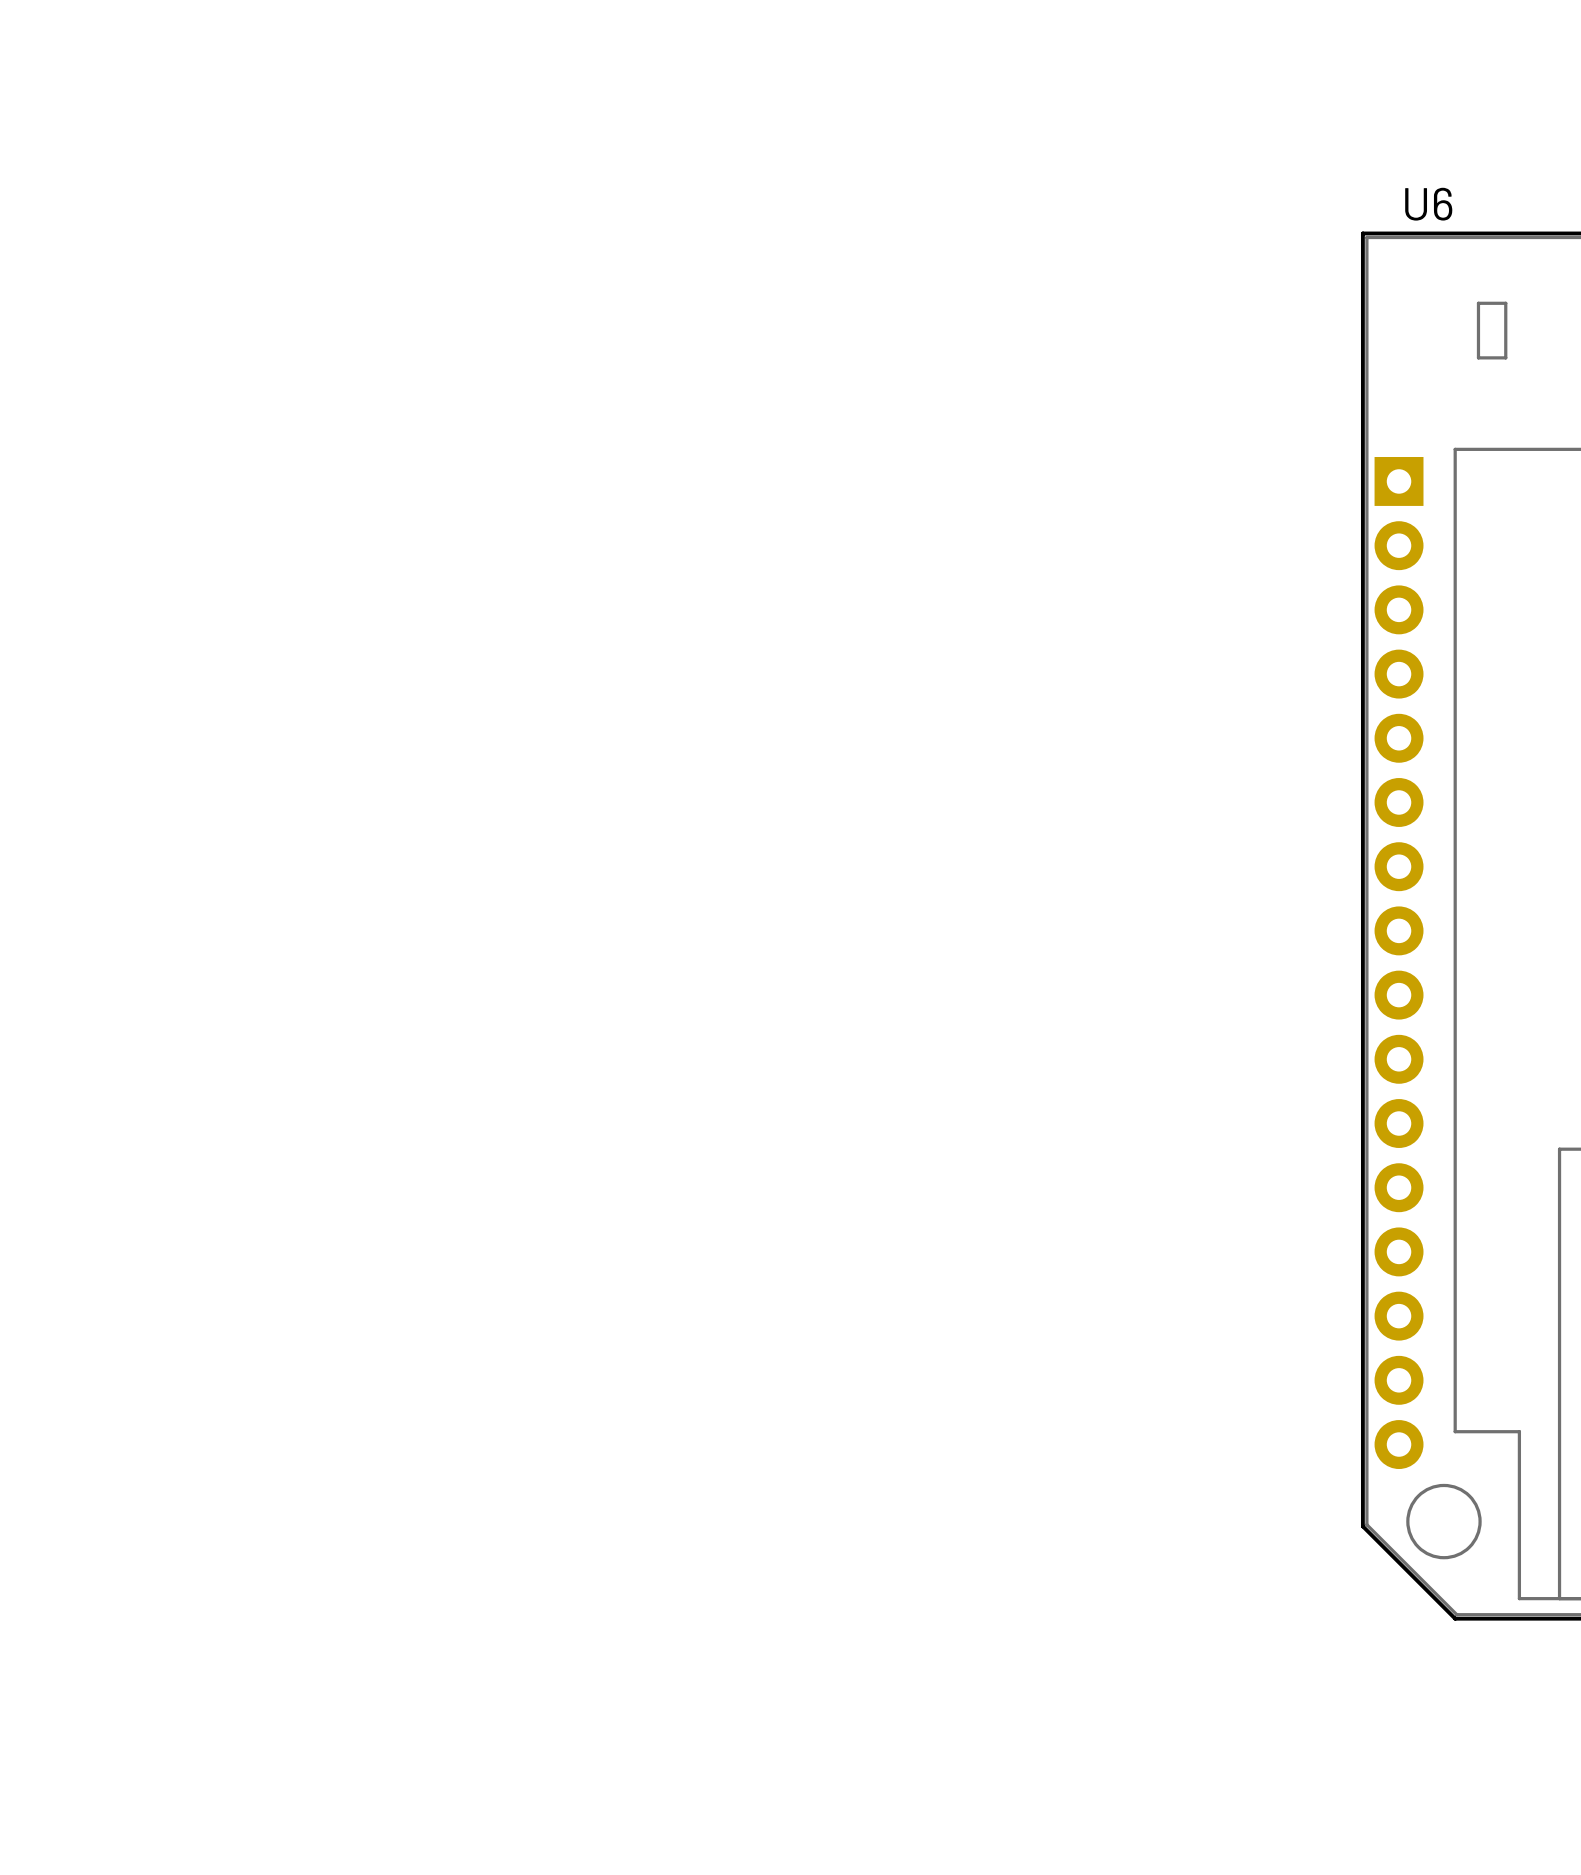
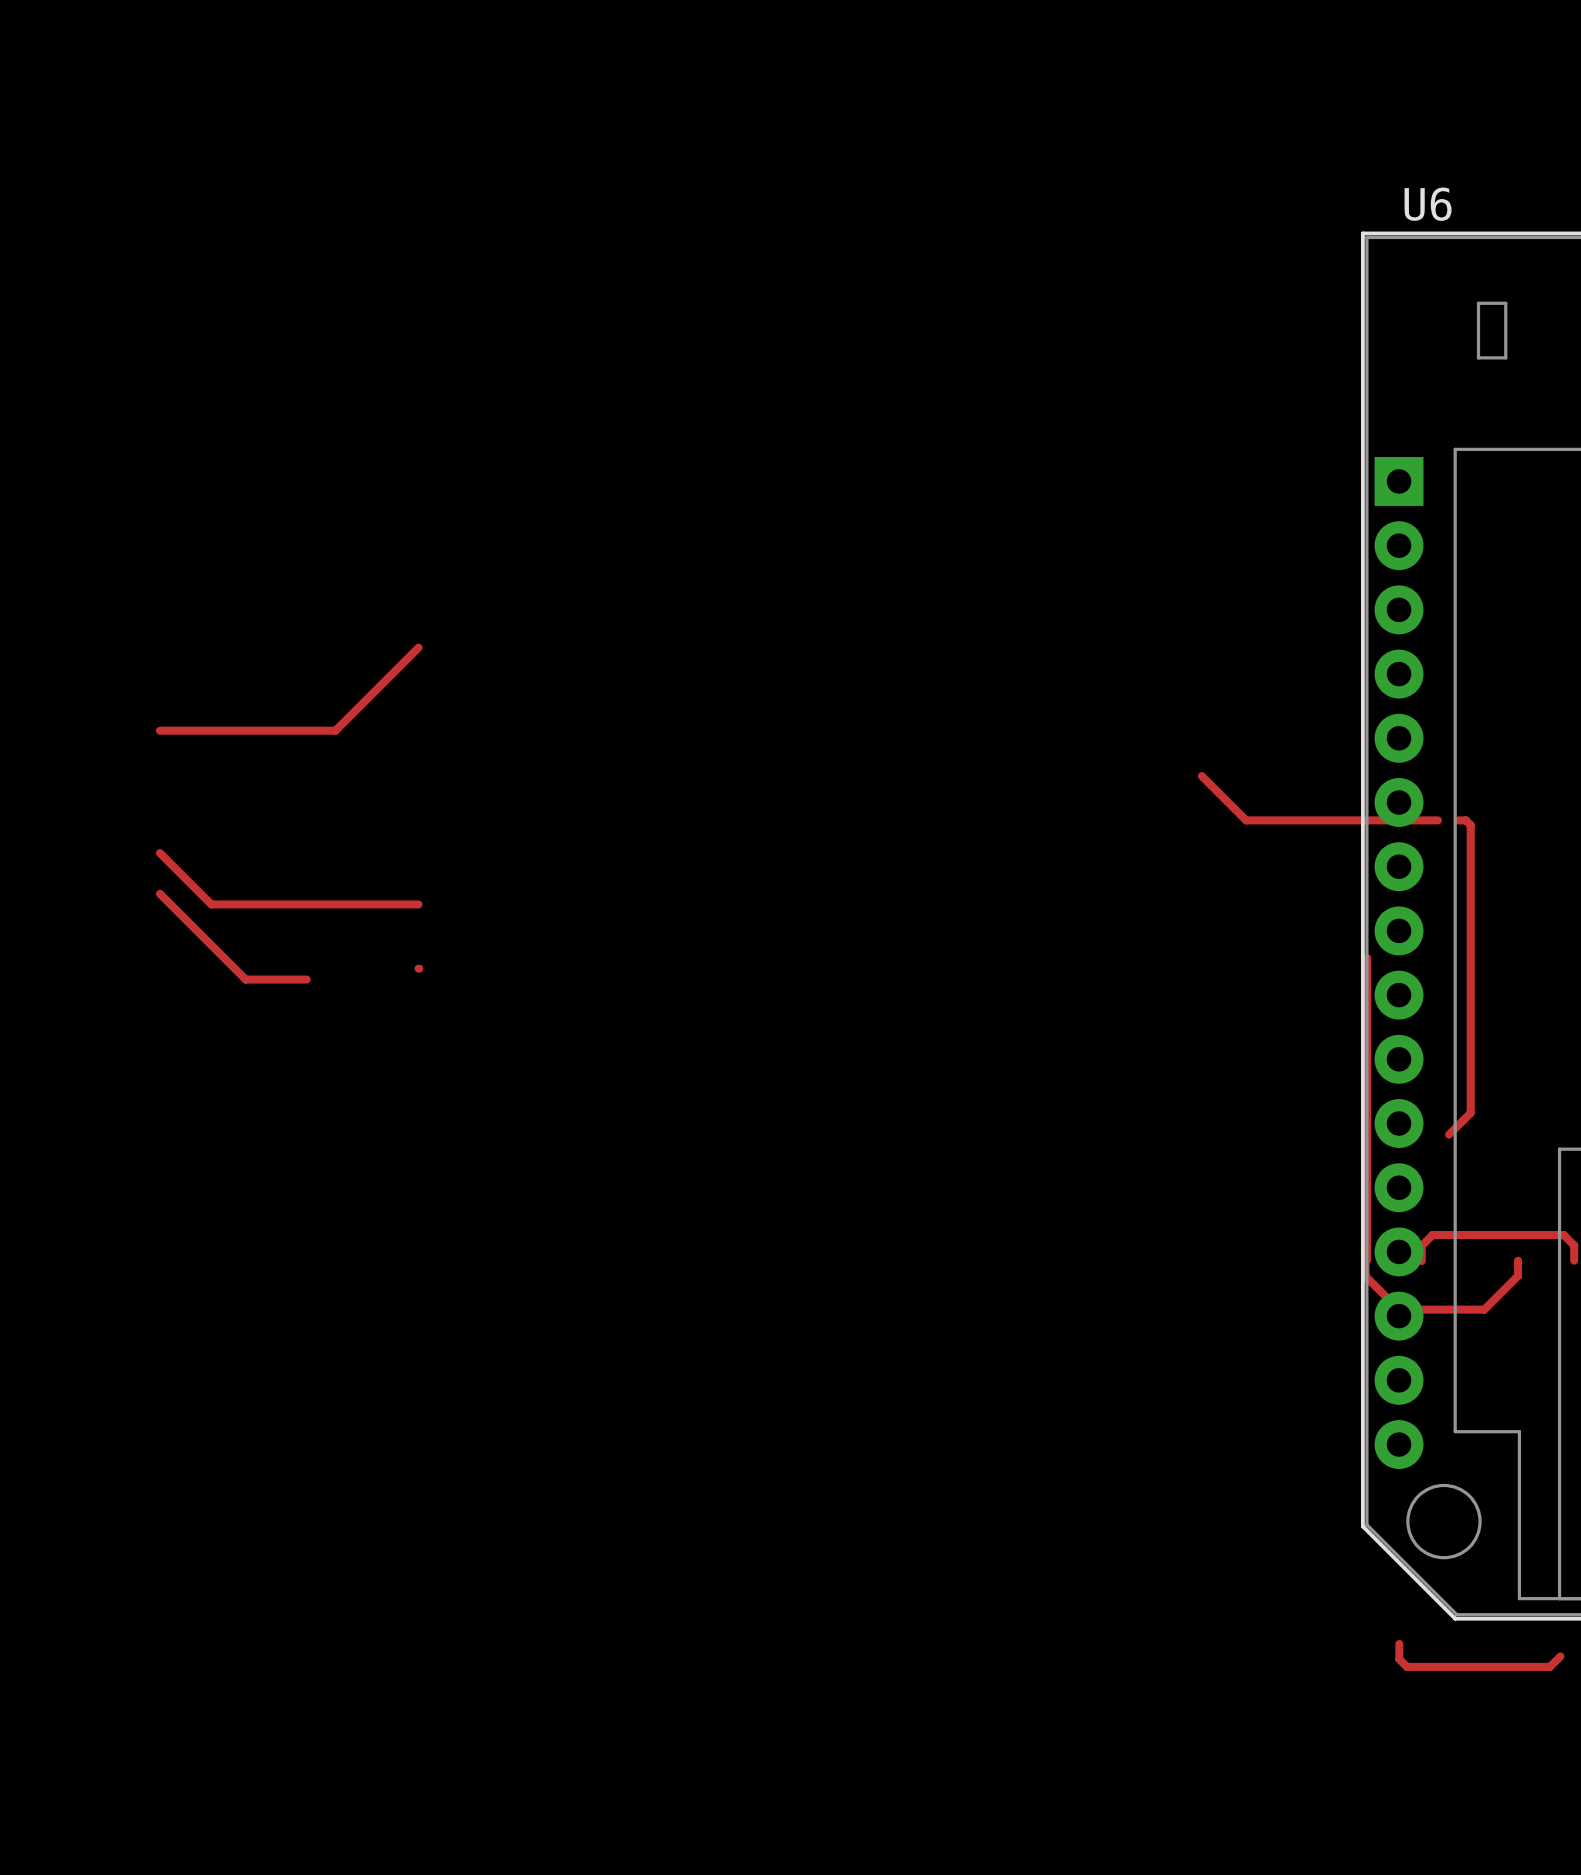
track: none -> (418, 647) (335, 730) (159, 730)
track: none -> (1201, 776) (1246, 820) (1437, 820)
track: none -> (1458, 820) (1465, 820) (1470, 825) (1470, 1112) (1449, 1134)
track: none -> (159, 853) (211, 904) (418, 904)
track: none -> (159, 893) (245, 979) (306, 979)
track: none -> (1367, 958) (1367, 1259) (1365, 1276) (1398, 1309) (1484, 1309) (1518, 1275) (1518, 1260)
track: none -> (418, 968) (419, 968)
track: none -> (1574, 1260) (1574, 1245) (1563, 1235) (1432, 1235) (1421, 1245) (1421, 1261)
track: none -> (1399, 1643) (1399, 1659) (1407, 1666) (1550, 1666) (1560, 1656)

